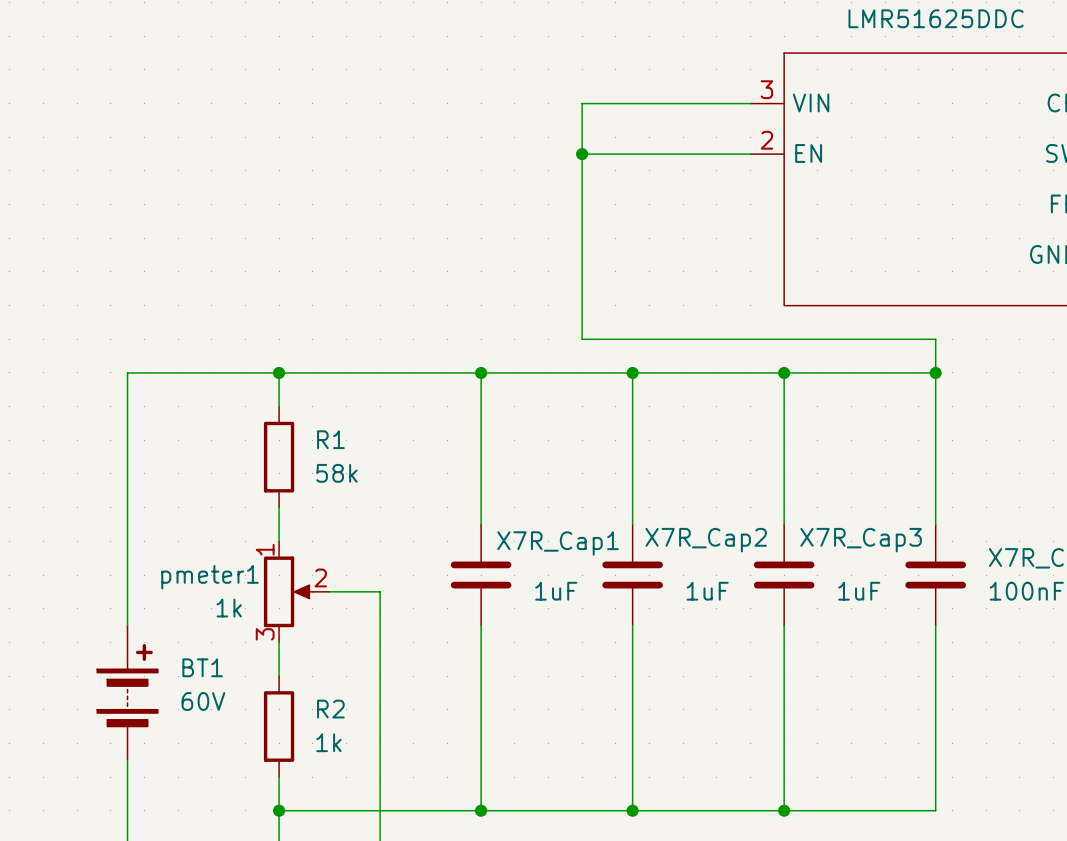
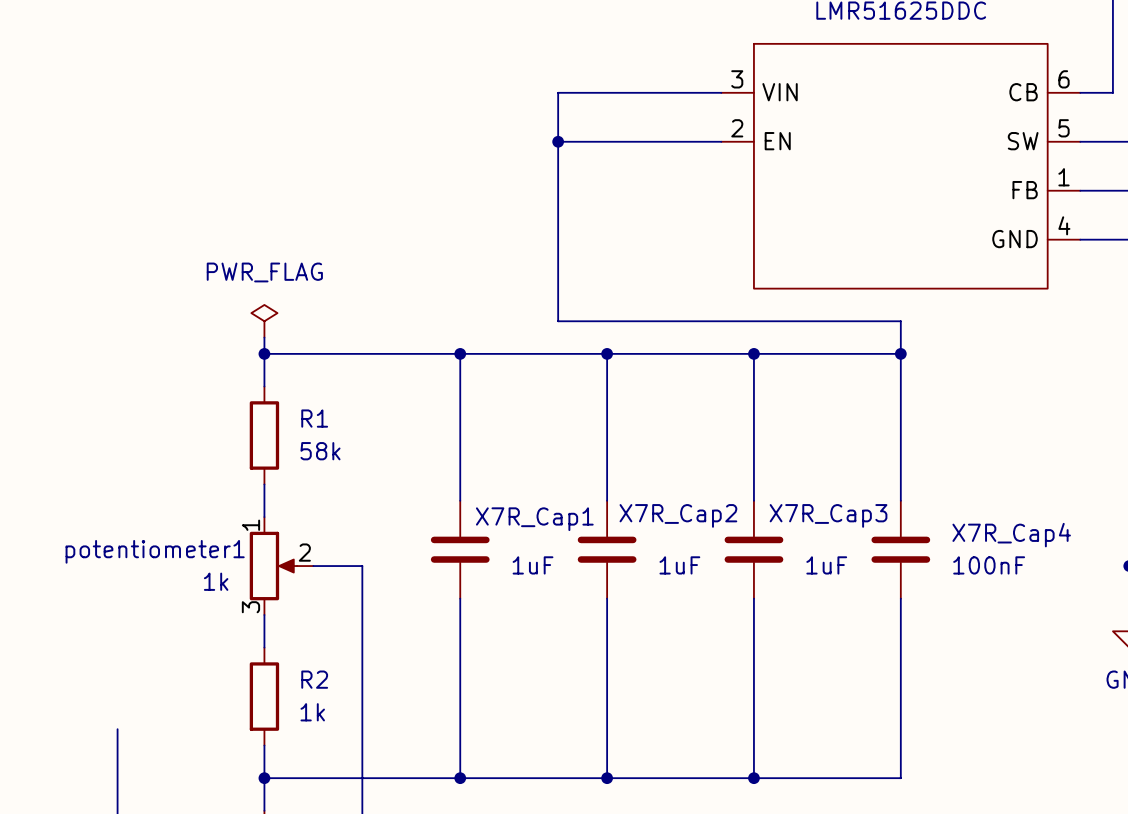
power symbol: none -> PWR_FLAG (264, 321)
wire: (279, 372) (127, 372) (127, 625) -> (264, 353) (264, 337)
pmeter1 name: pmeter1 (209, 577) -> potentiometer1 (155, 551)
BT1: 60V (127, 692) -> none

